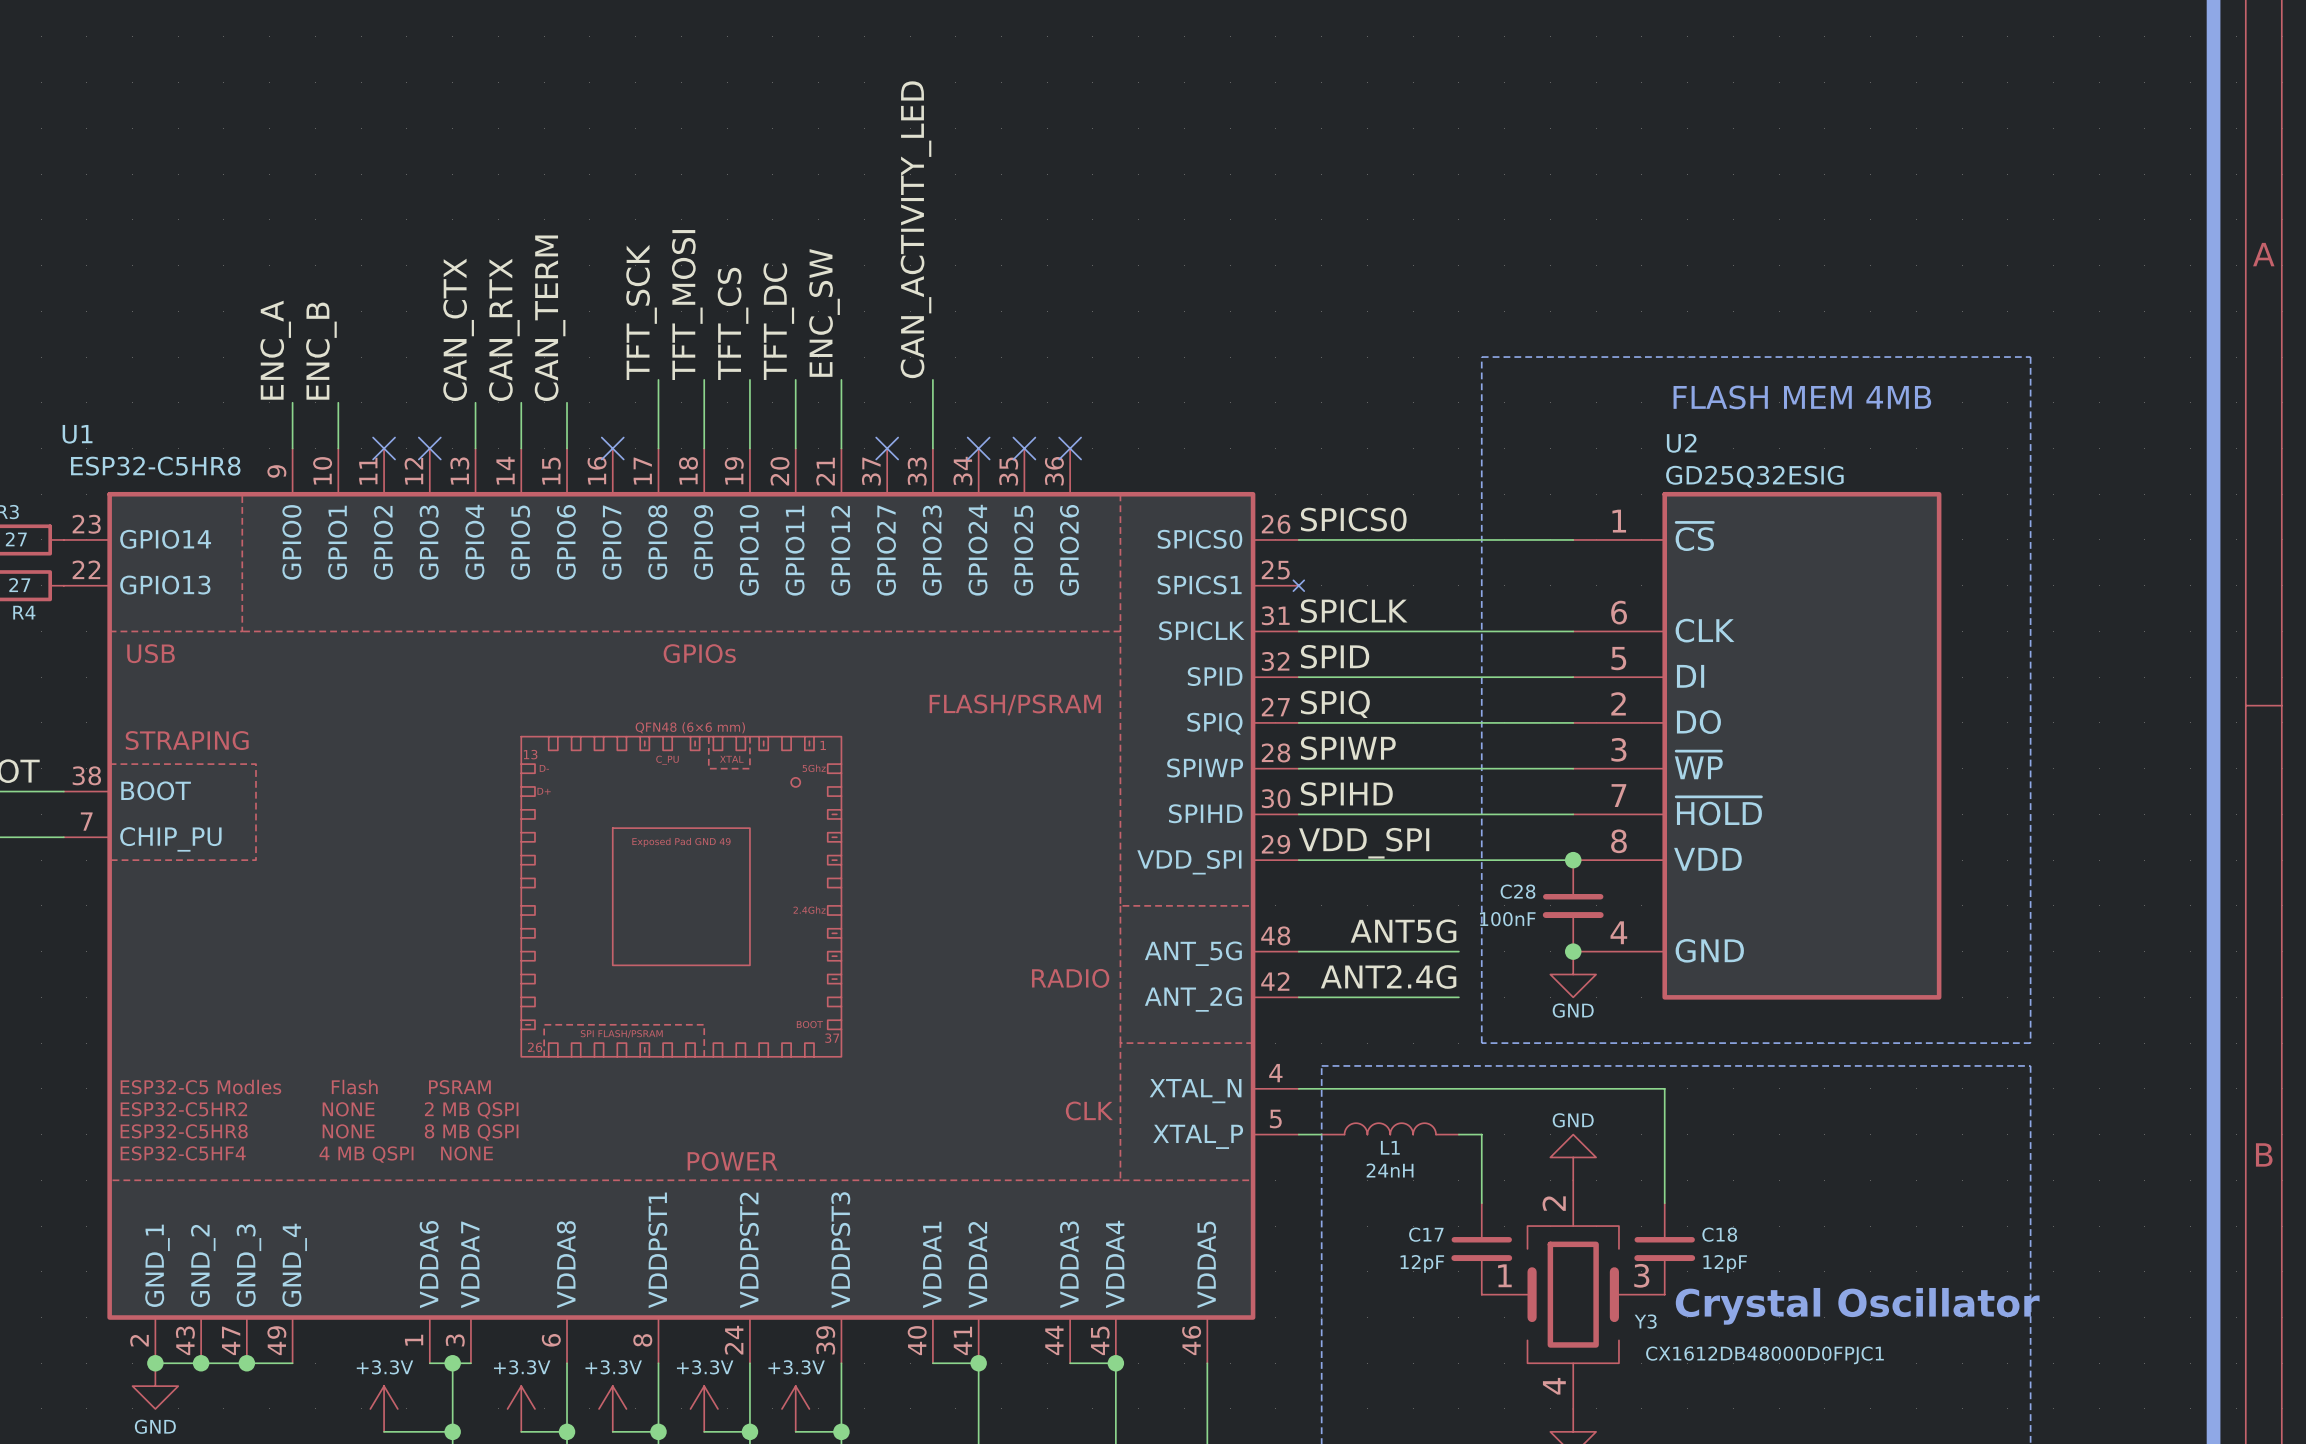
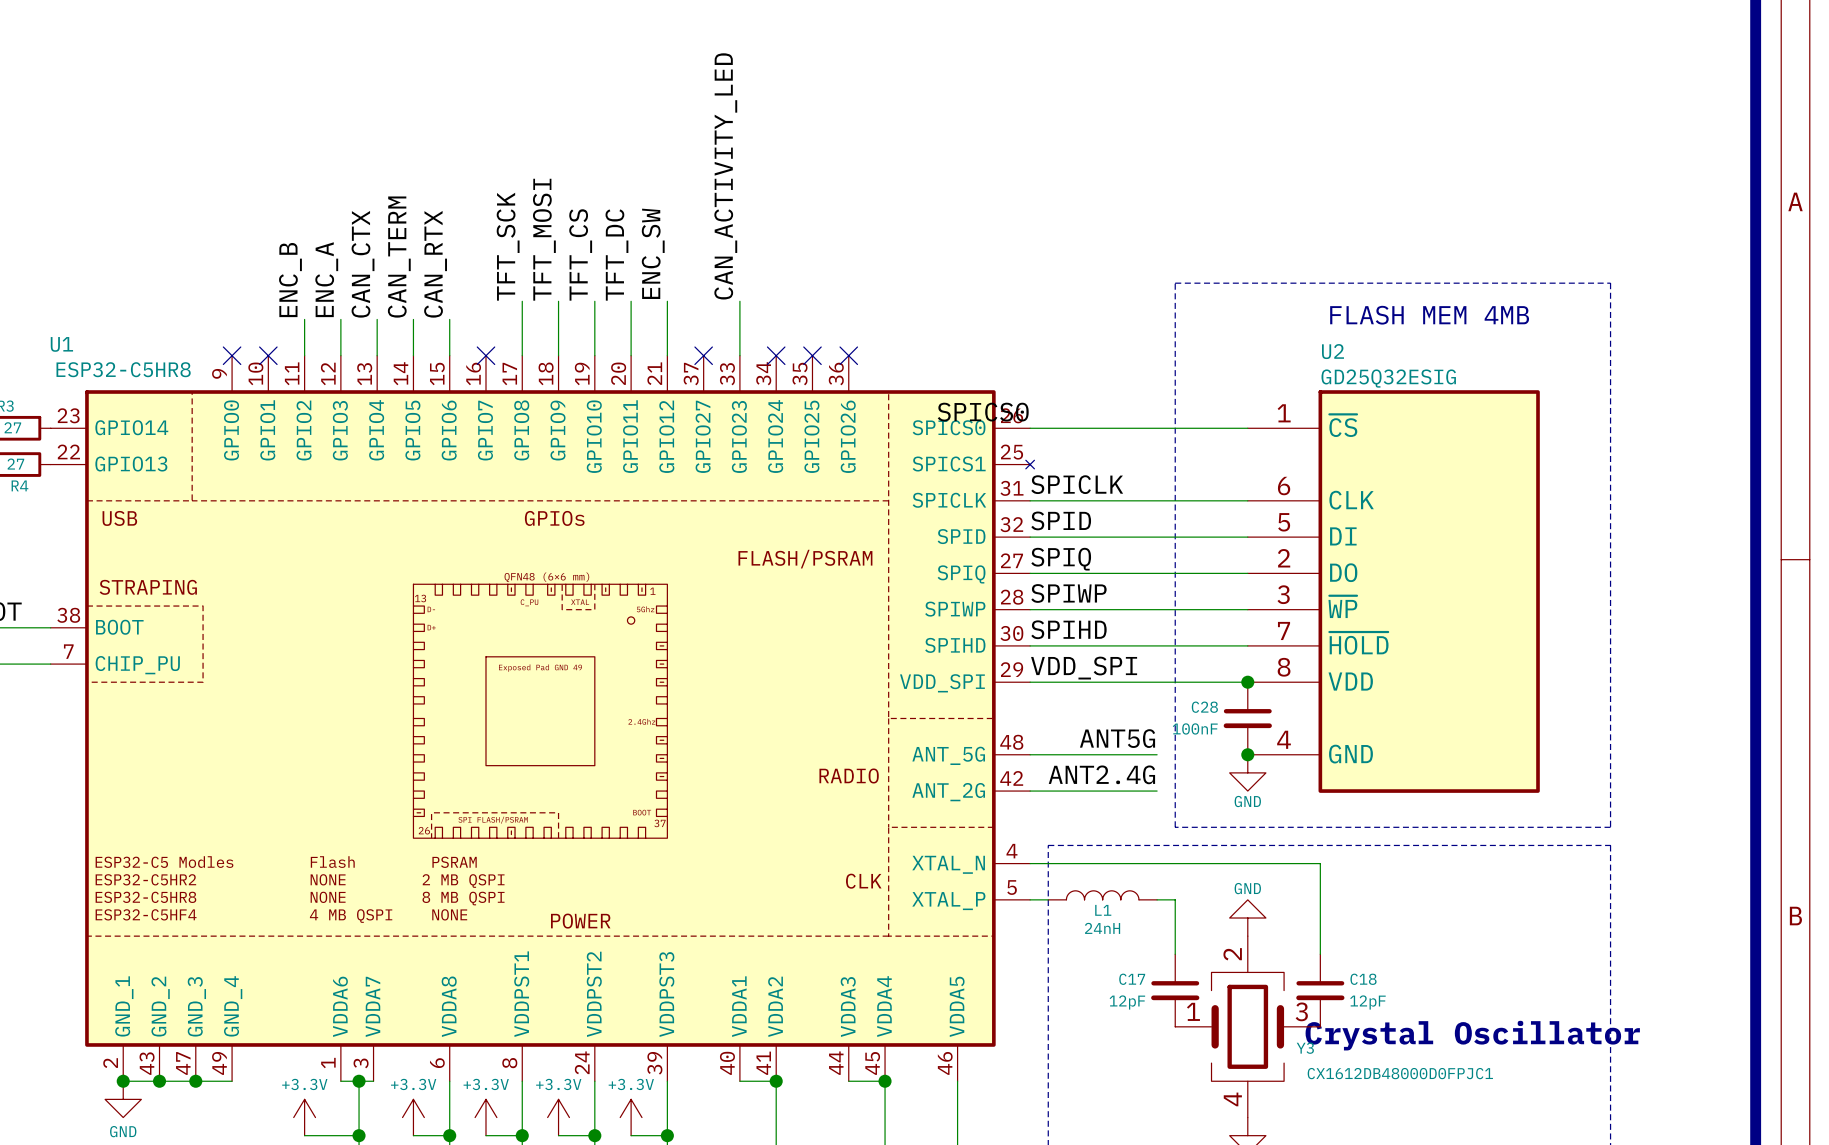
label: CAN_TERM (550, 318) -> CAN_RTX (435, 264)
label: CAN_RTX (504, 329) -> CAN_TERM (399, 257)
label position: ENC_A (275, 350) -> ENC_A (326, 279)
label position: ENC_B (321, 351) -> ENC_B (290, 280)
wire: (292, 402) (292, 448) -> (304, 319) (304, 355)
wire: (338, 402) (338, 448) -> (340, 319) (340, 355)
no-connect mark: none -> (232, 355)
no-connect mark: none -> (268, 355)
no-connect mark: (384, 448) -> none
no-connect mark: (429, 448) -> none
label position: SPICS0 (1353, 519) -> SPICS0 (983, 412)

